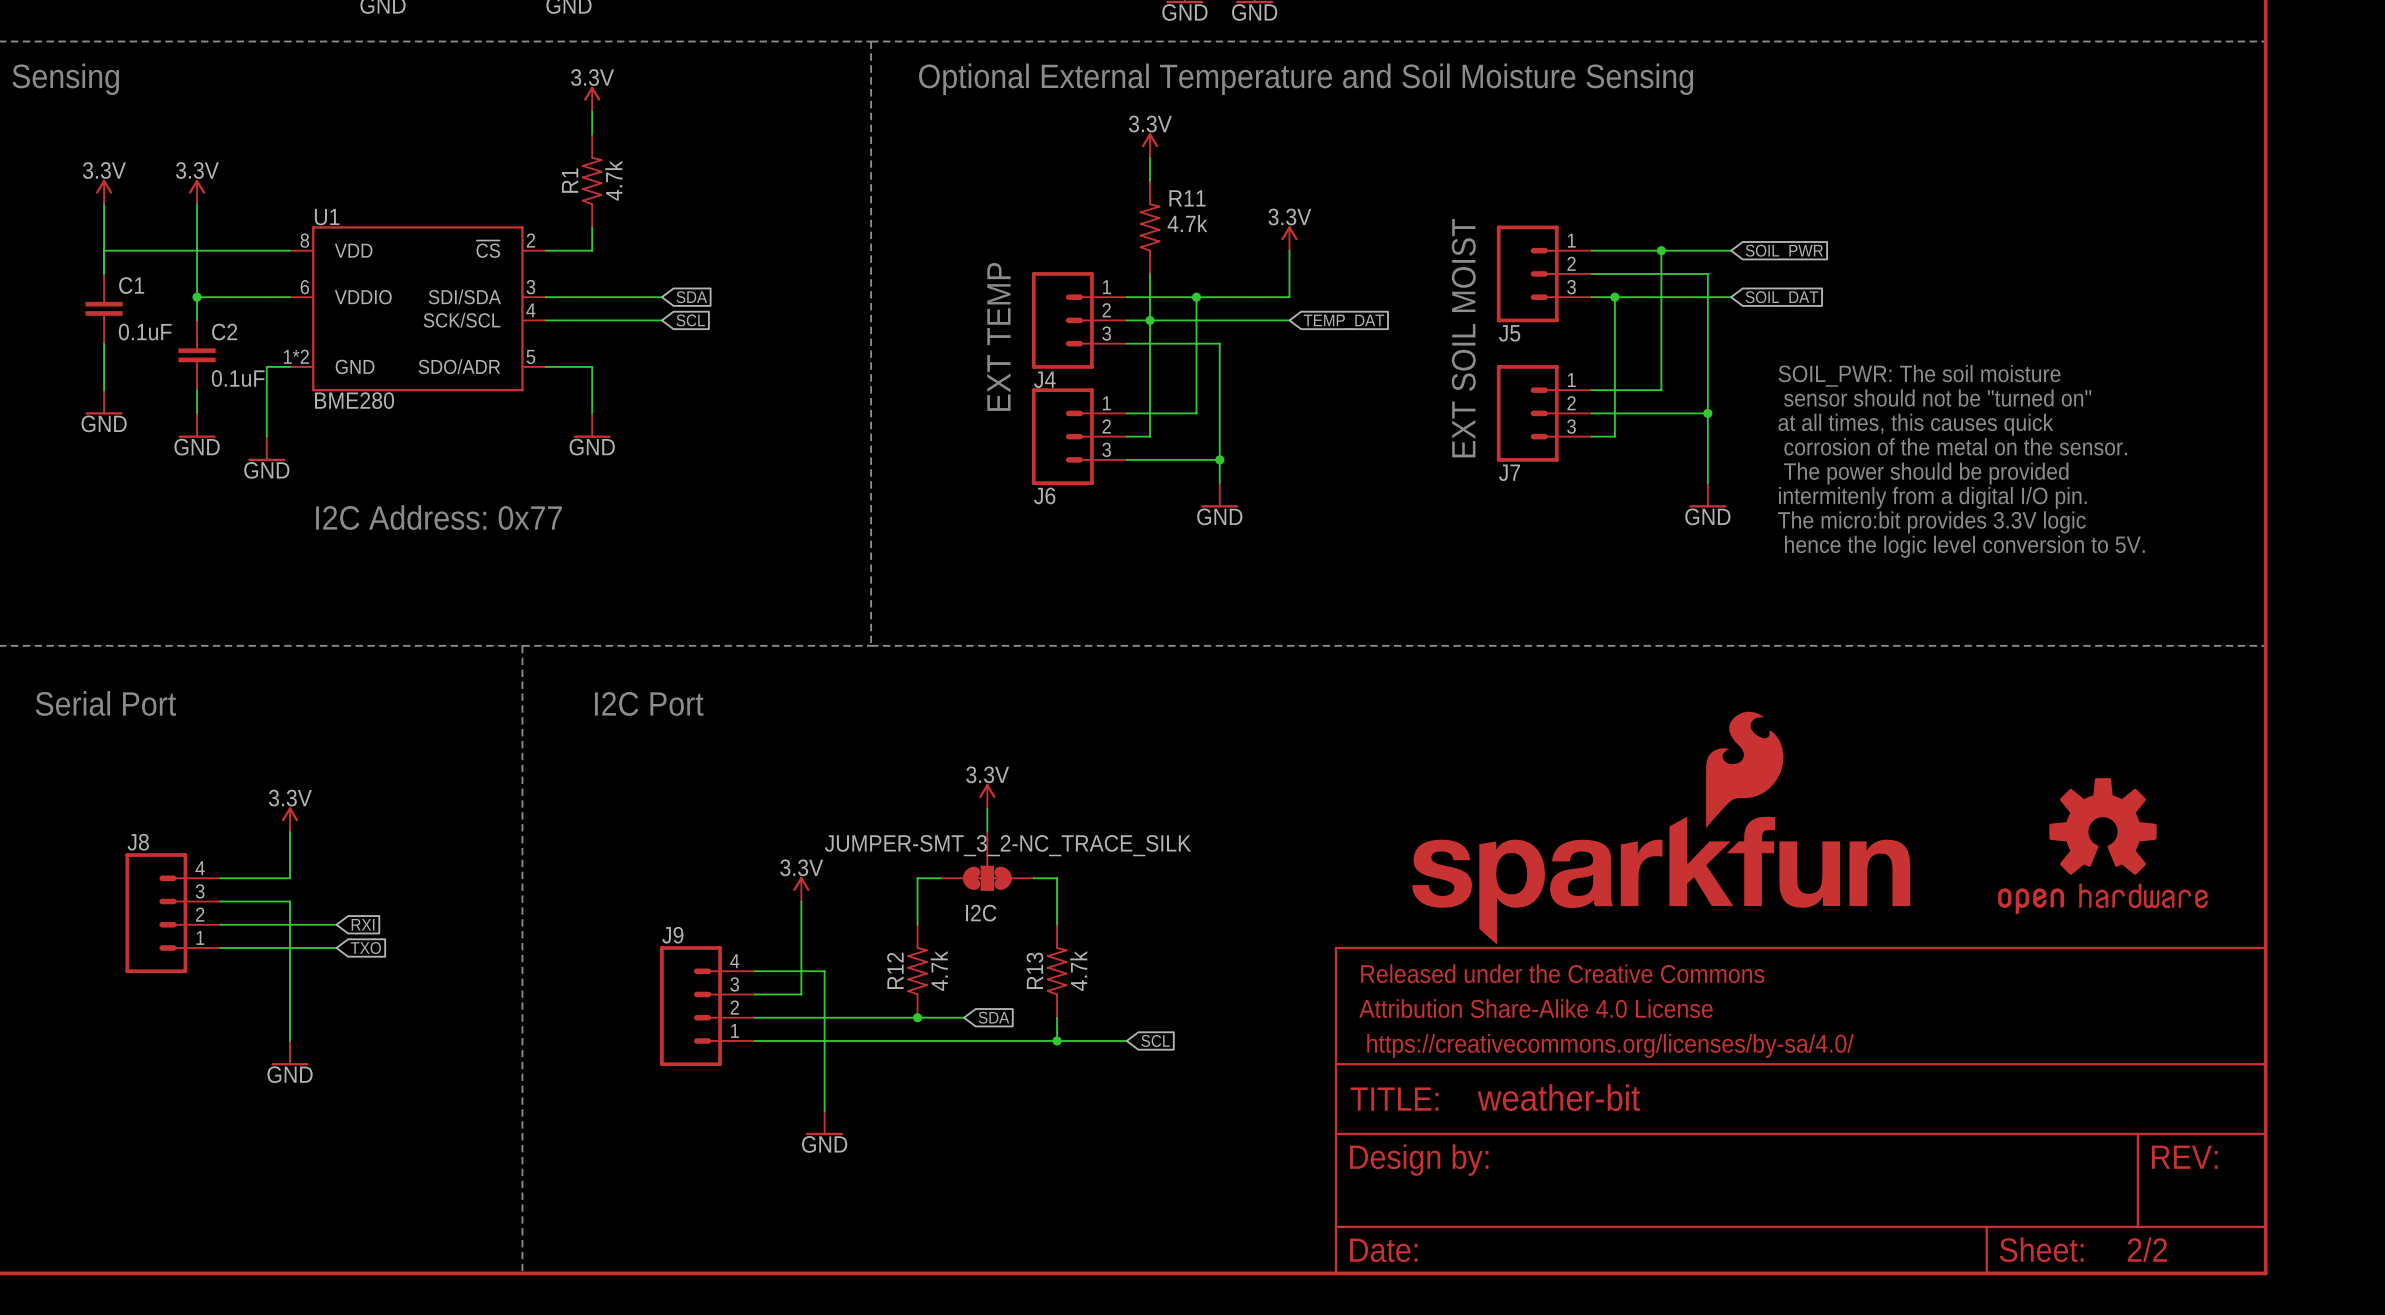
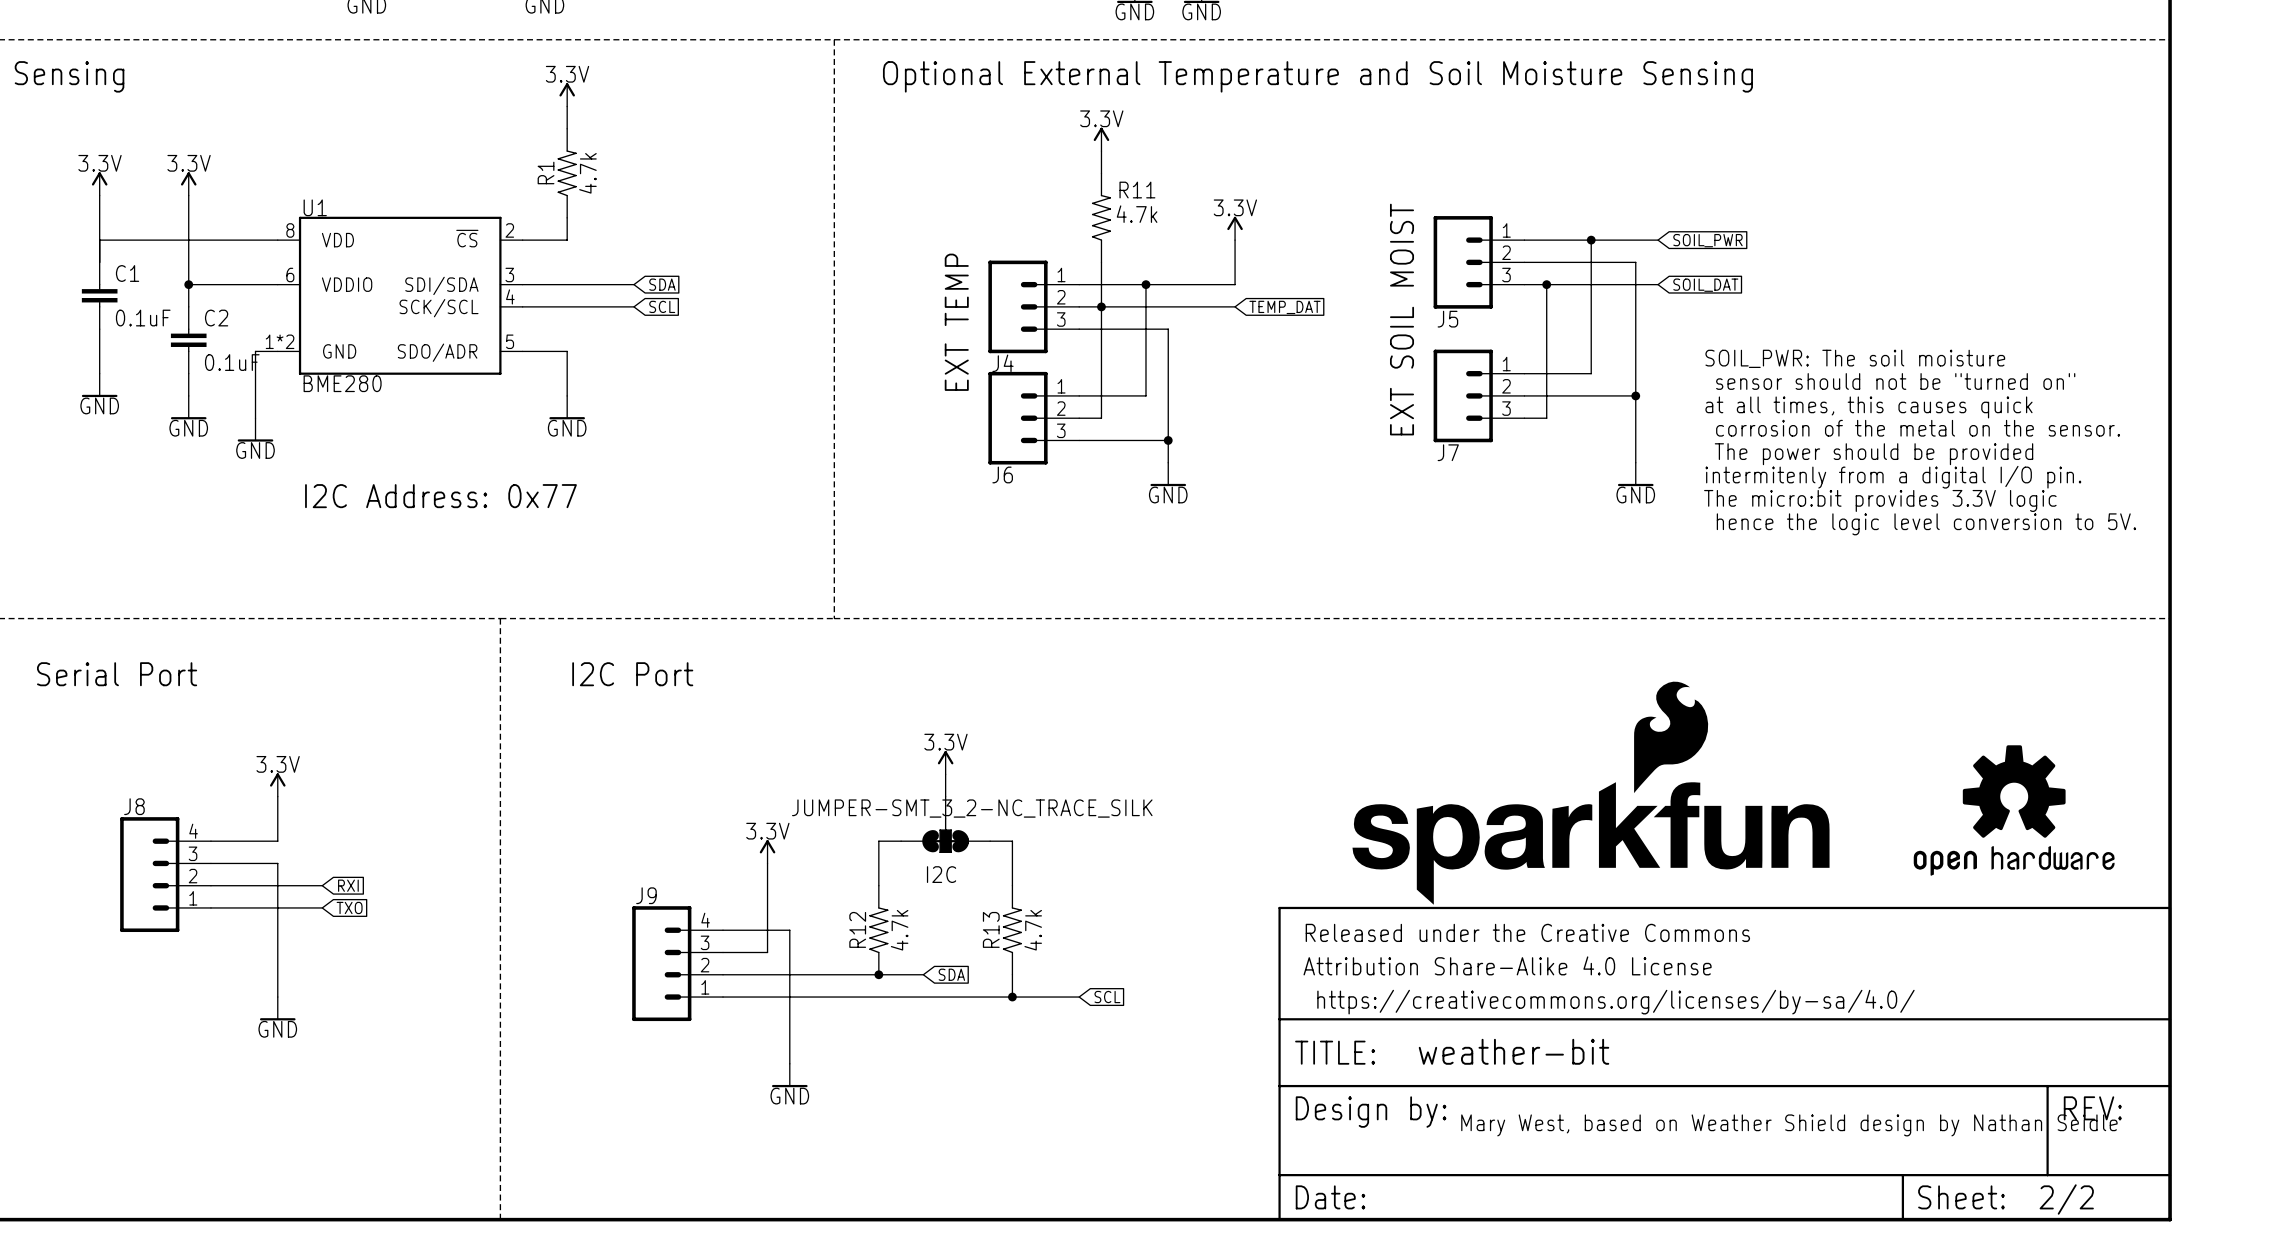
text: none -> Mary West, based on Weather Shield design by Nathan Seidle (1789, 1125)

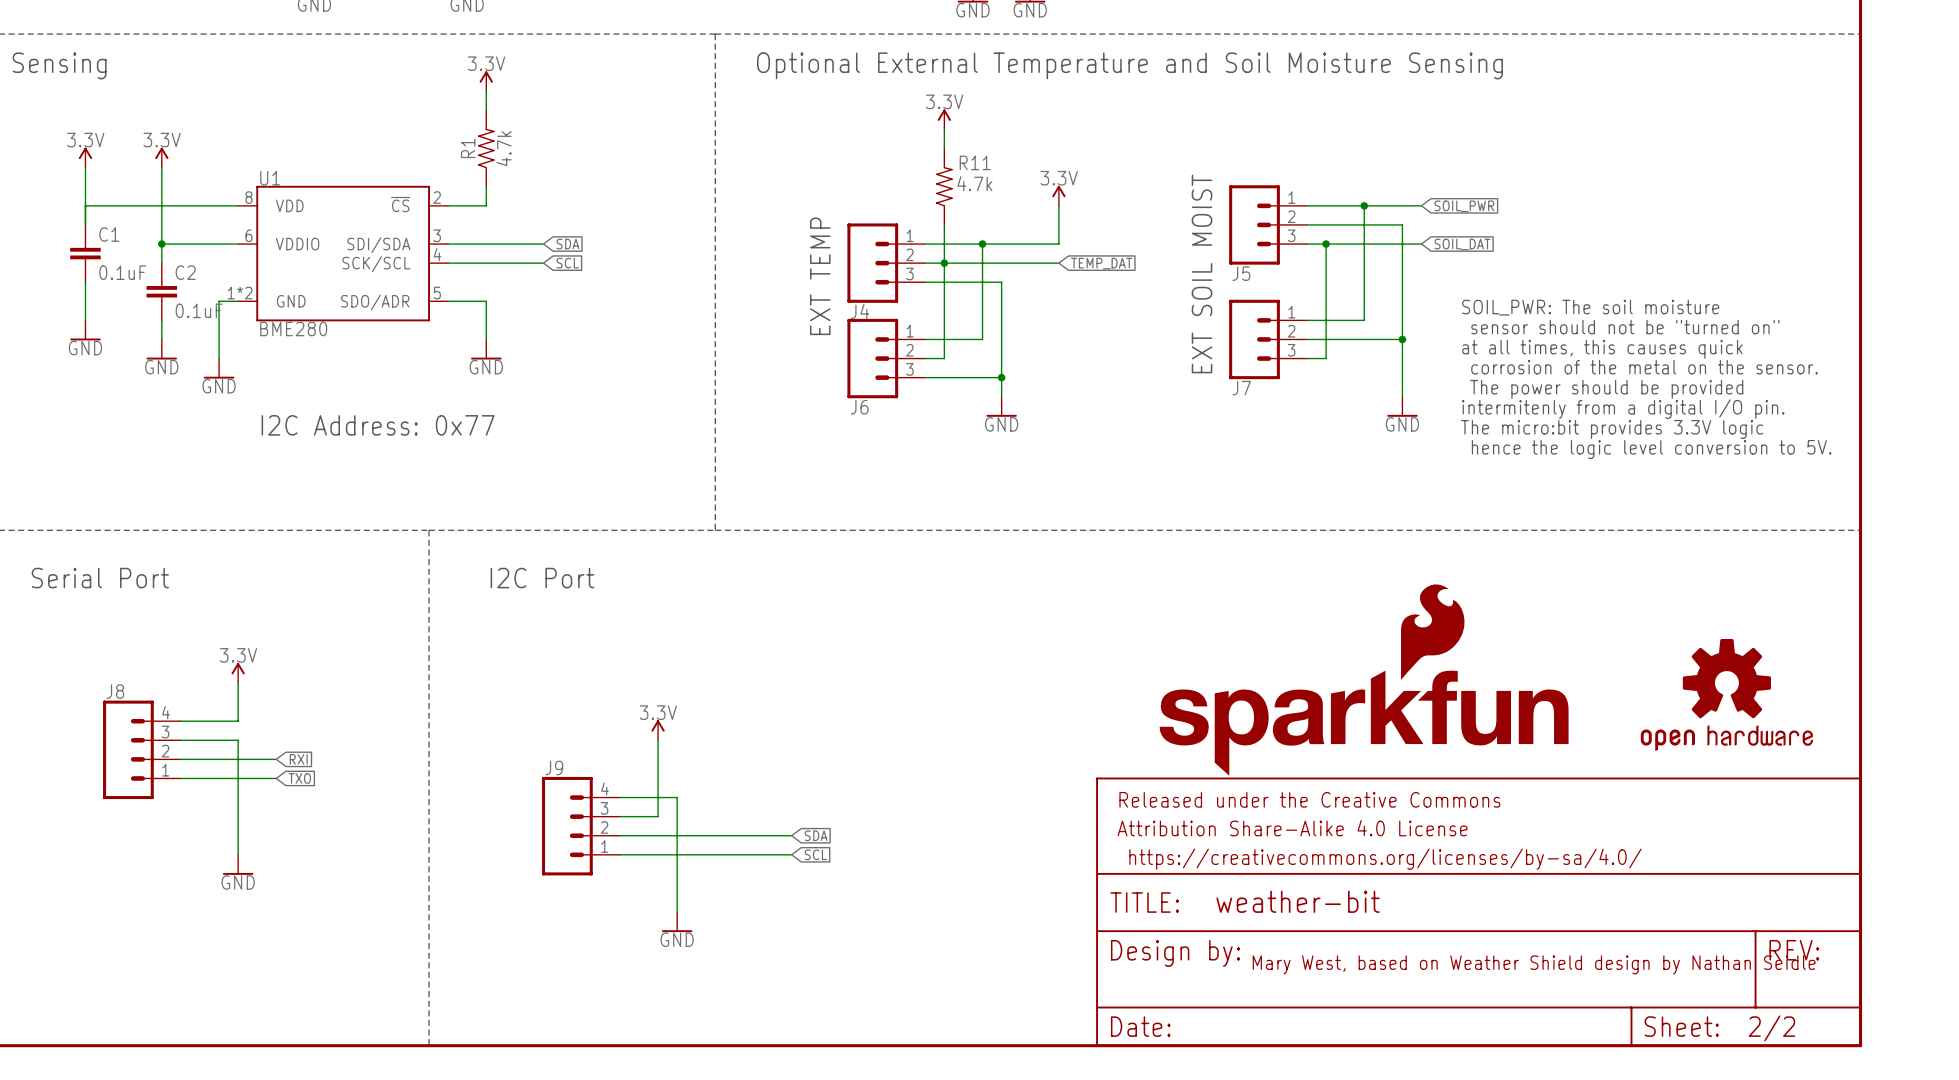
power symbol: 3.3V (945, 762) -> none
wire: (945, 774) (945, 796) -> none
I2C: JUMPER-SMT_3_2-NC_TRACE_SILK (945, 824) -> none
wire: (901, 841) (878, 841) (878, 885) -> none
wire: (990, 841) (1012, 841) (1012, 885) -> none
R12: 4.7k (878, 930) -> none
R13: 4.7k (1012, 930) -> none
junction: (878, 974) -> none
wire: (1012, 974) (1012, 997) -> none
wire: (923, 997) (1079, 997) -> none
junction: (1012, 997) -> none
global label position: SCL (1107, 997) -> SCL (815, 854)

